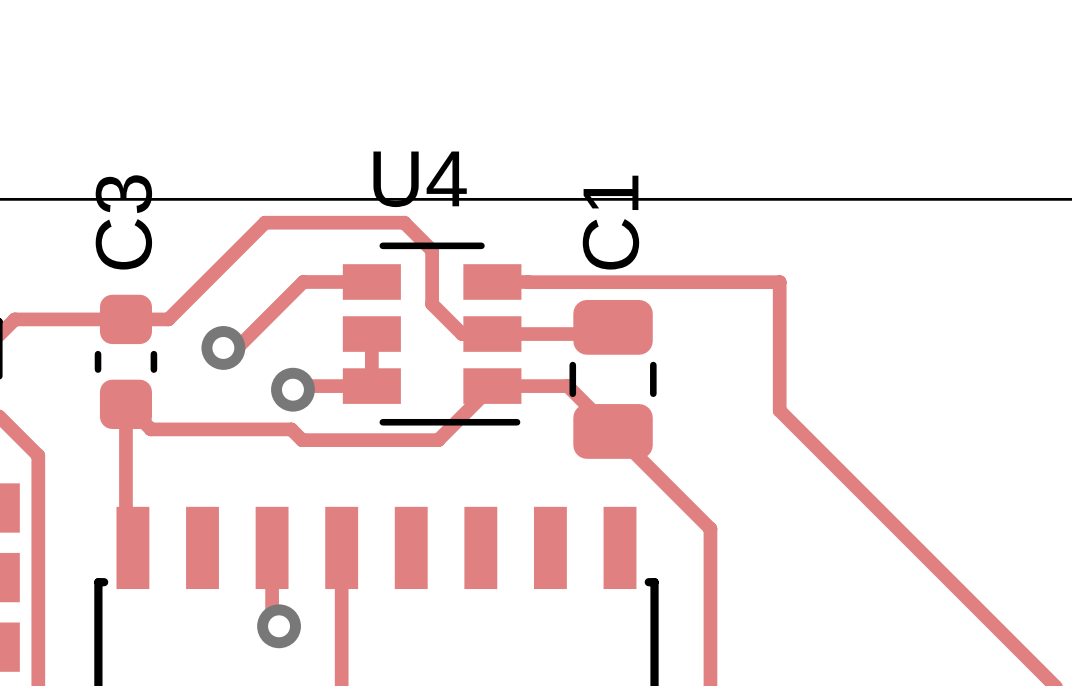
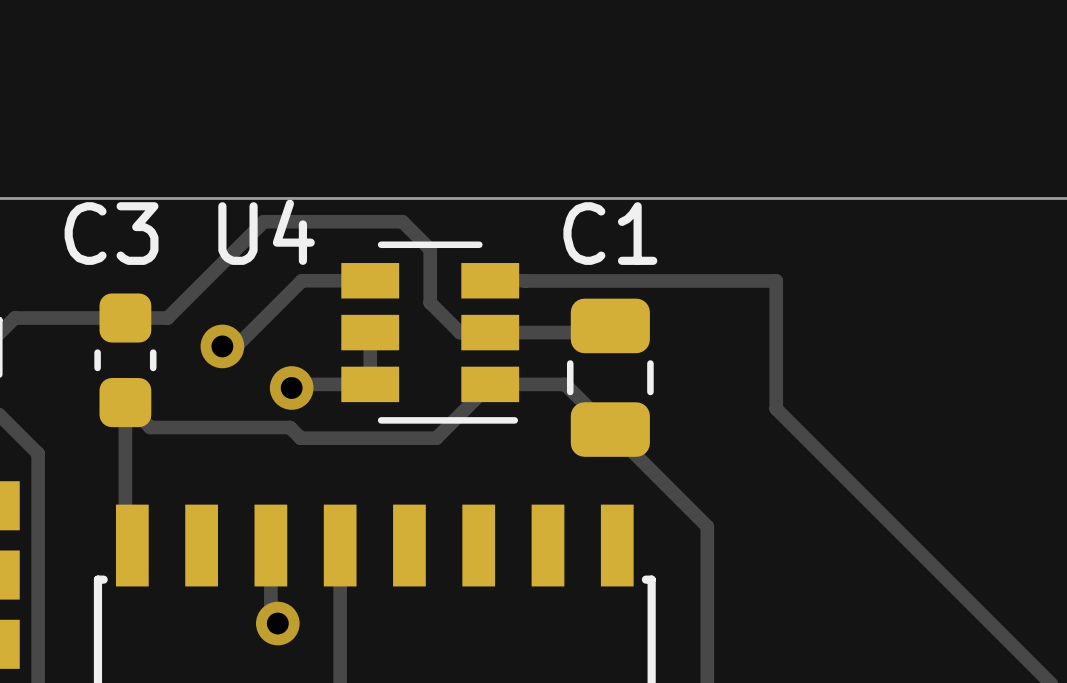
U4 name position: U4 (420, 179) -> U4 (266, 232)
C3 name rotation: 0° (123, 222) -> 90° clockwise (111, 233)
C1 name rotation: 0° (610, 222) -> 90° clockwise (610, 233)

